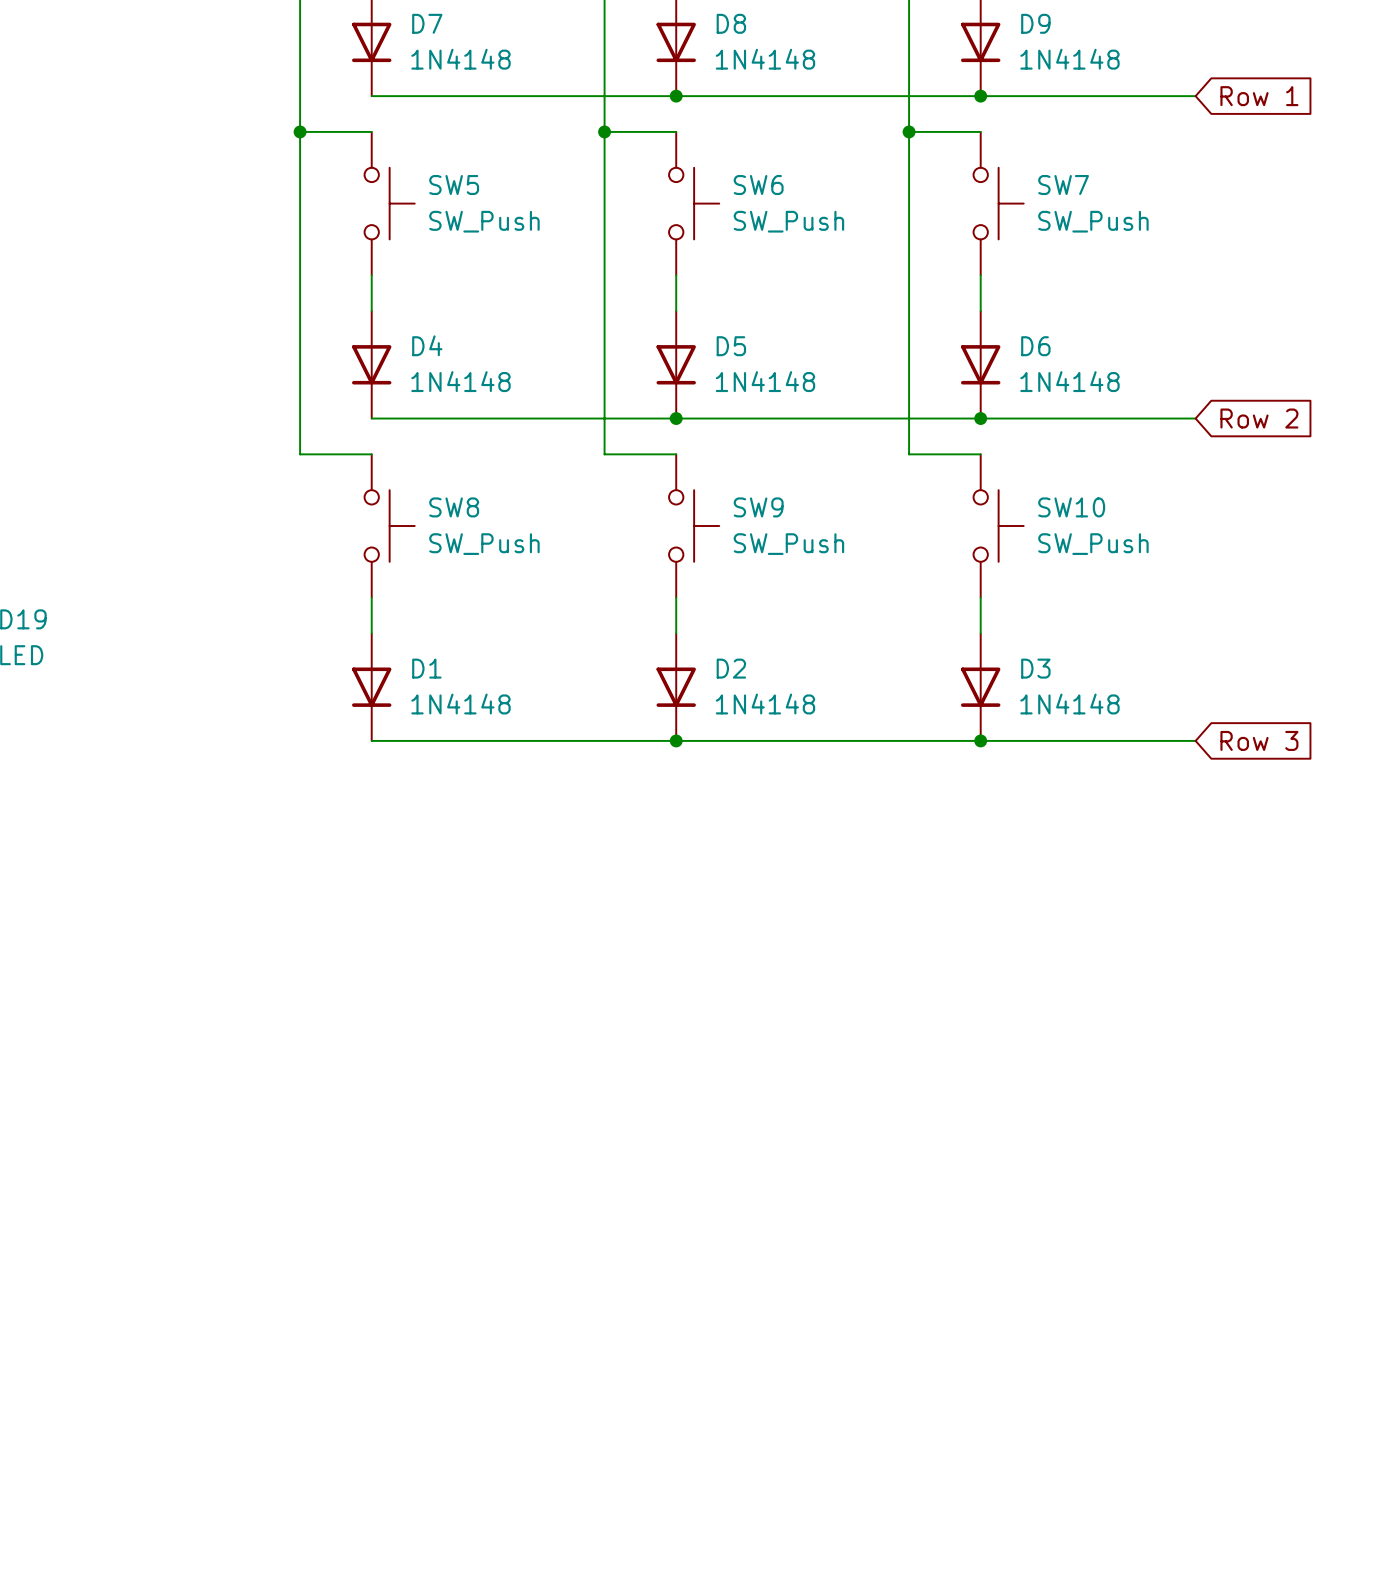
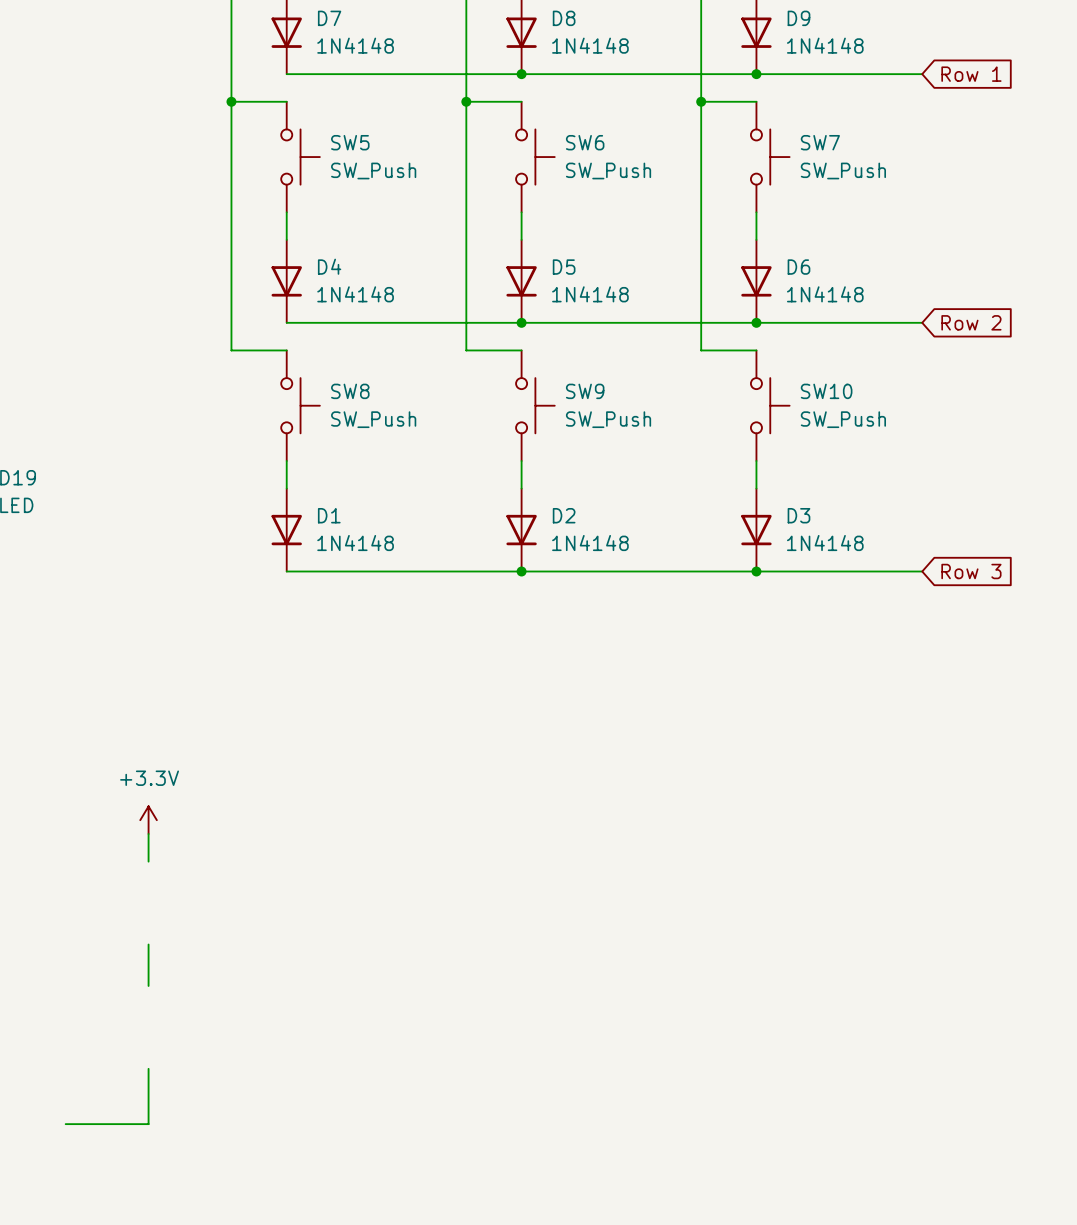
power symbol: none -> +3.3V (148, 820)
wire: none -> (148, 834) (148, 861)
wire: none -> (148, 944) (148, 985)
wire: none -> (148, 1068) (148, 1124) (65, 1124)

